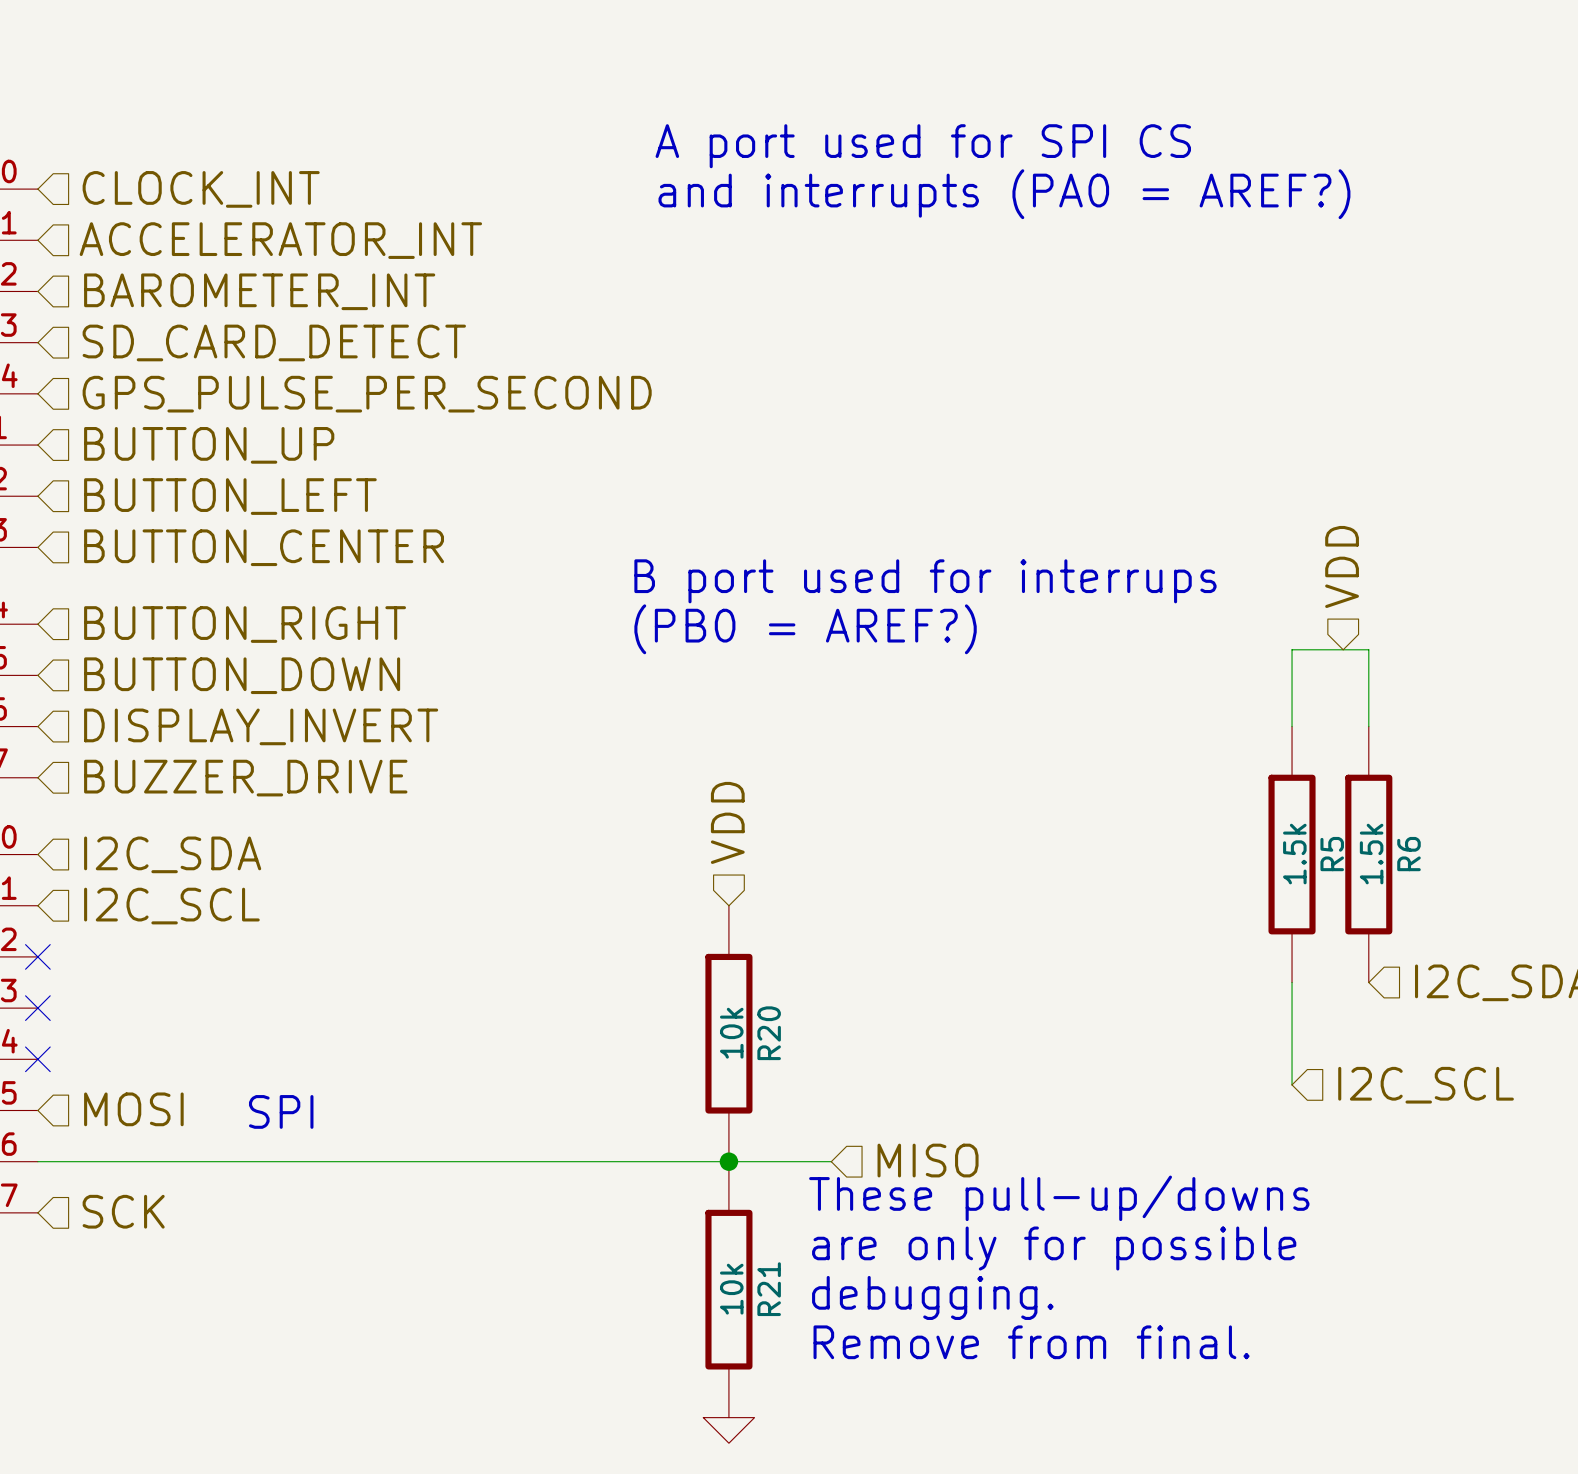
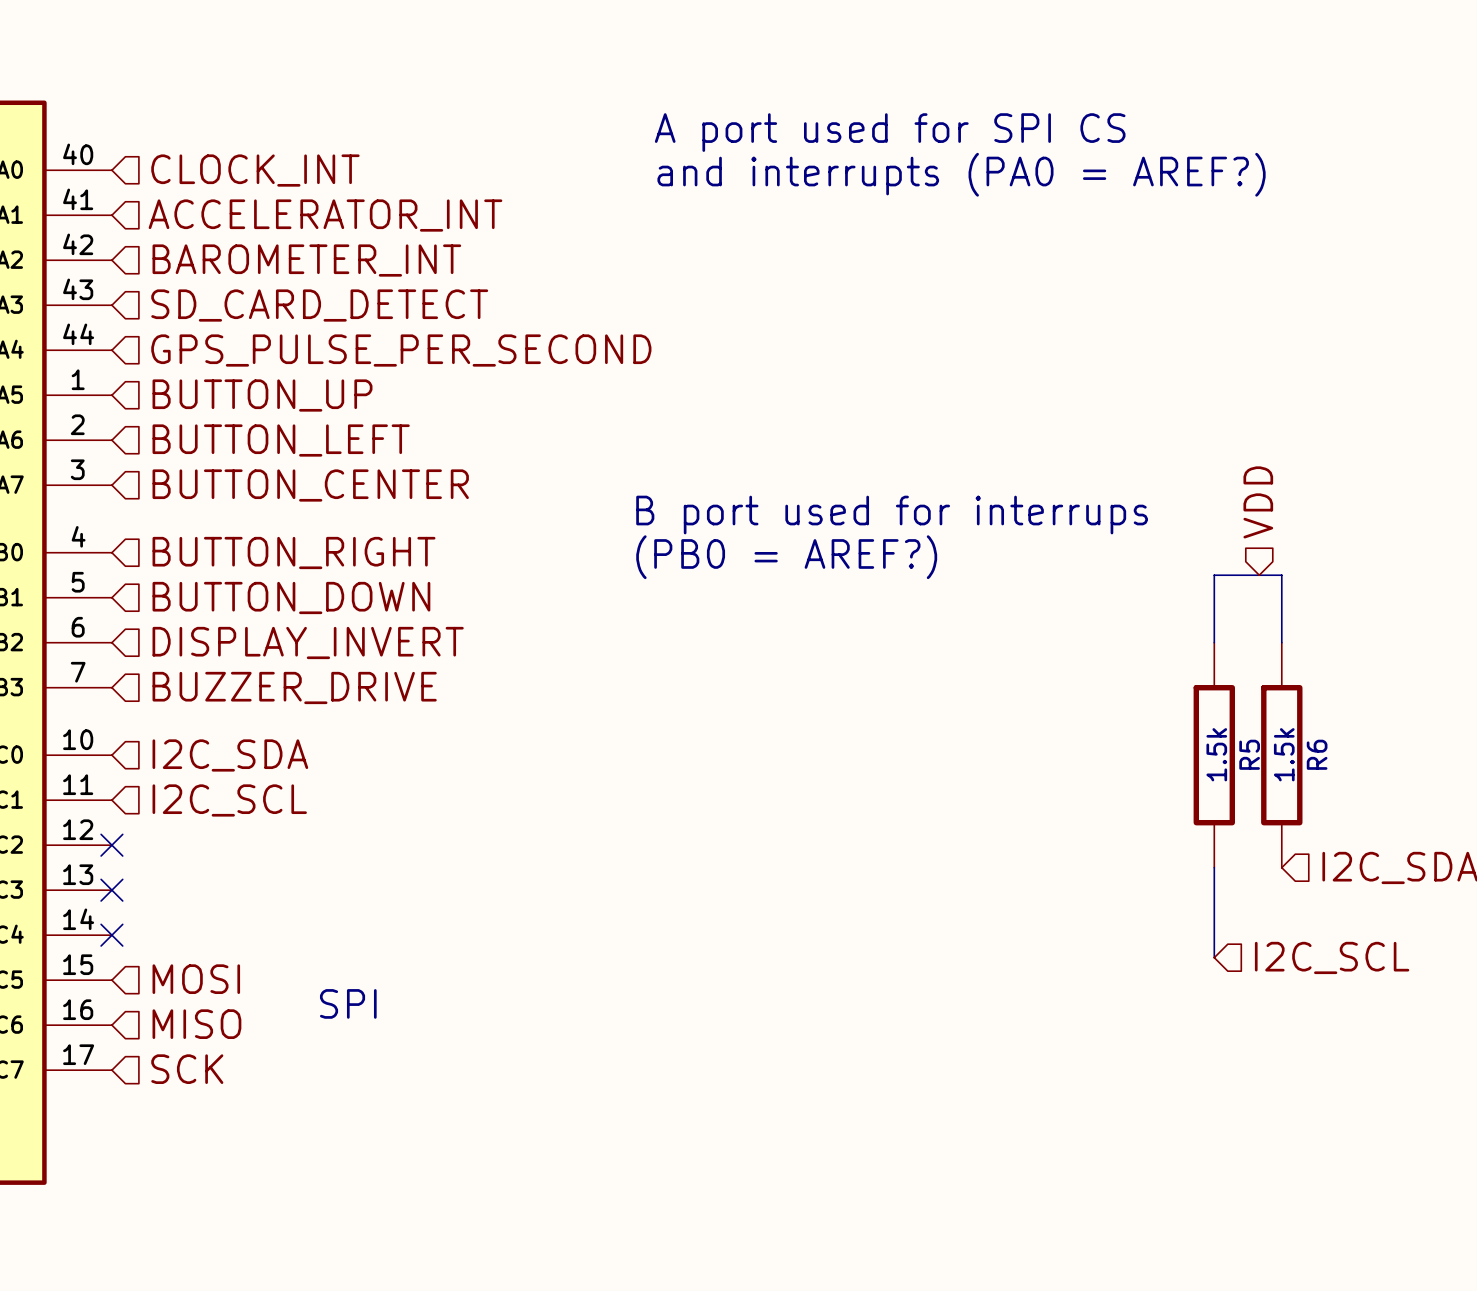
hierarchical label: VDD (727, 822) -> none
R20: 10k (728, 1033) -> none
text position: SPI (281, 1111) -> SPI (348, 1003)
hierarchical label: none -> MISO (196, 1024)
hierarchical label: MISO (928, 1160) -> none
wire: (37, 1161) (831, 1161) -> none
junction: (728, 1161) -> none
text: These pull-up/downs (1059, 1198) -> none
text: are only for possible (1054, 1248) -> none
R21: 10k (728, 1289) -> none
text: debugging. (932, 1297) -> none
text: Remove from final. (1031, 1342) -> none
power symbol: (728, 1430) -> none

